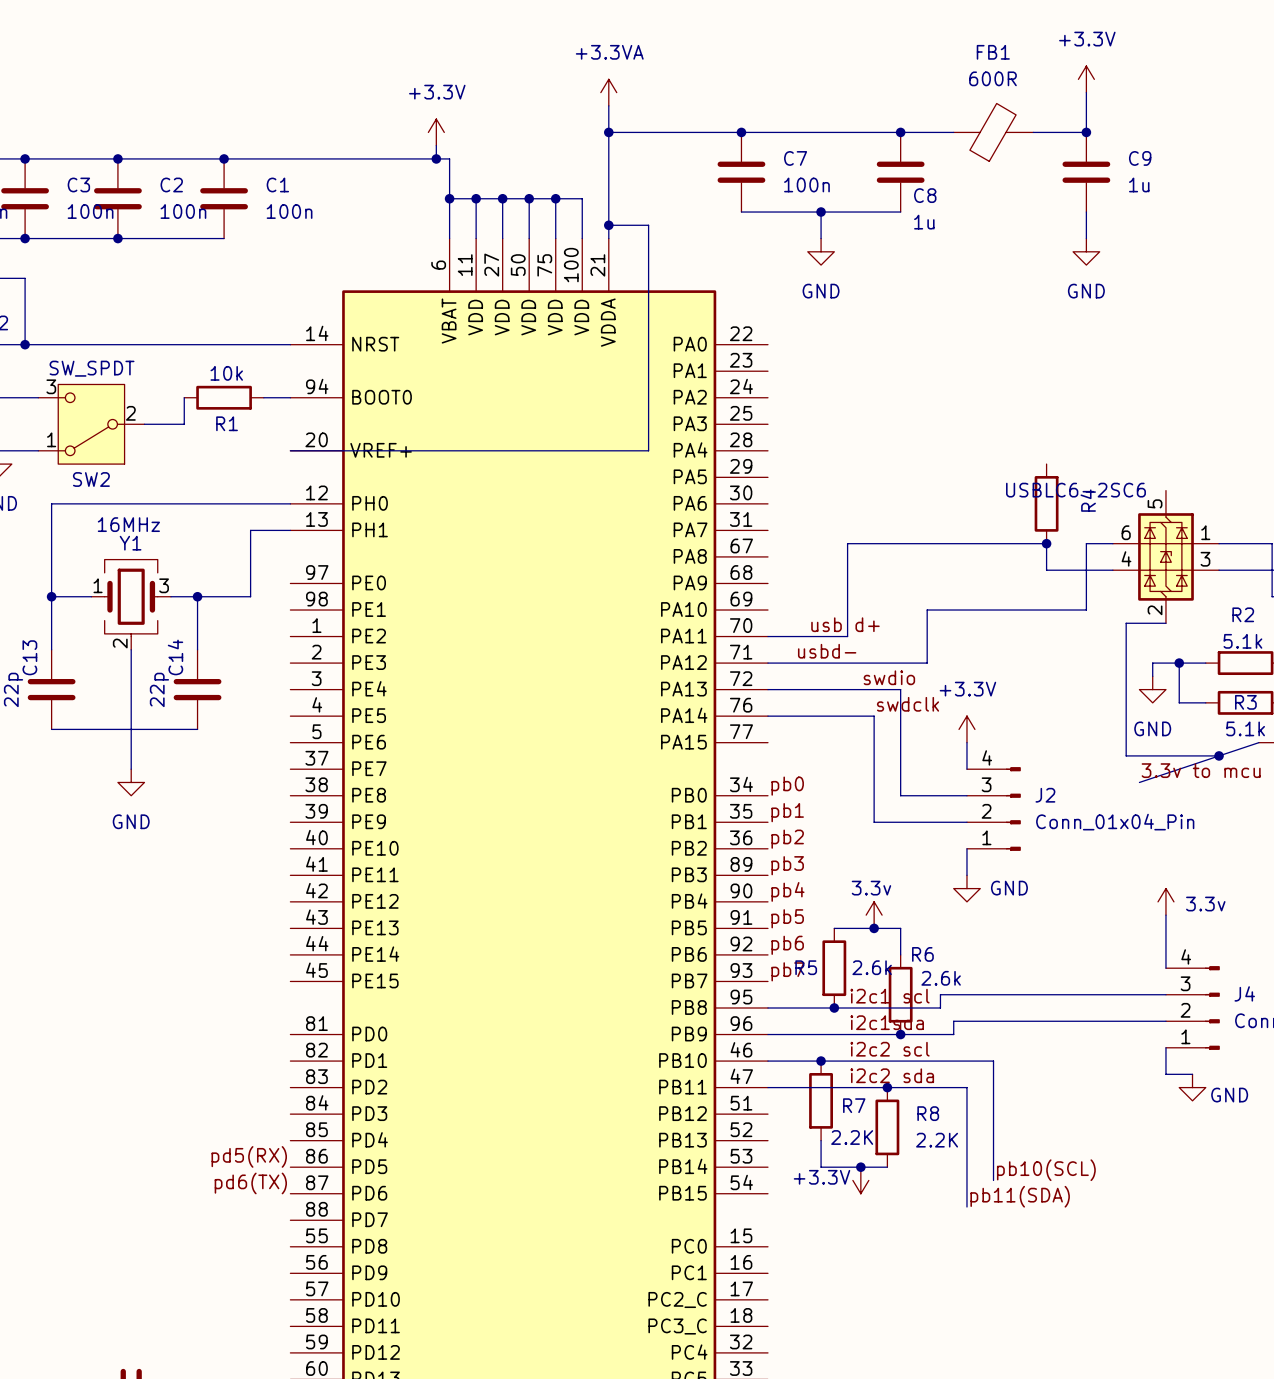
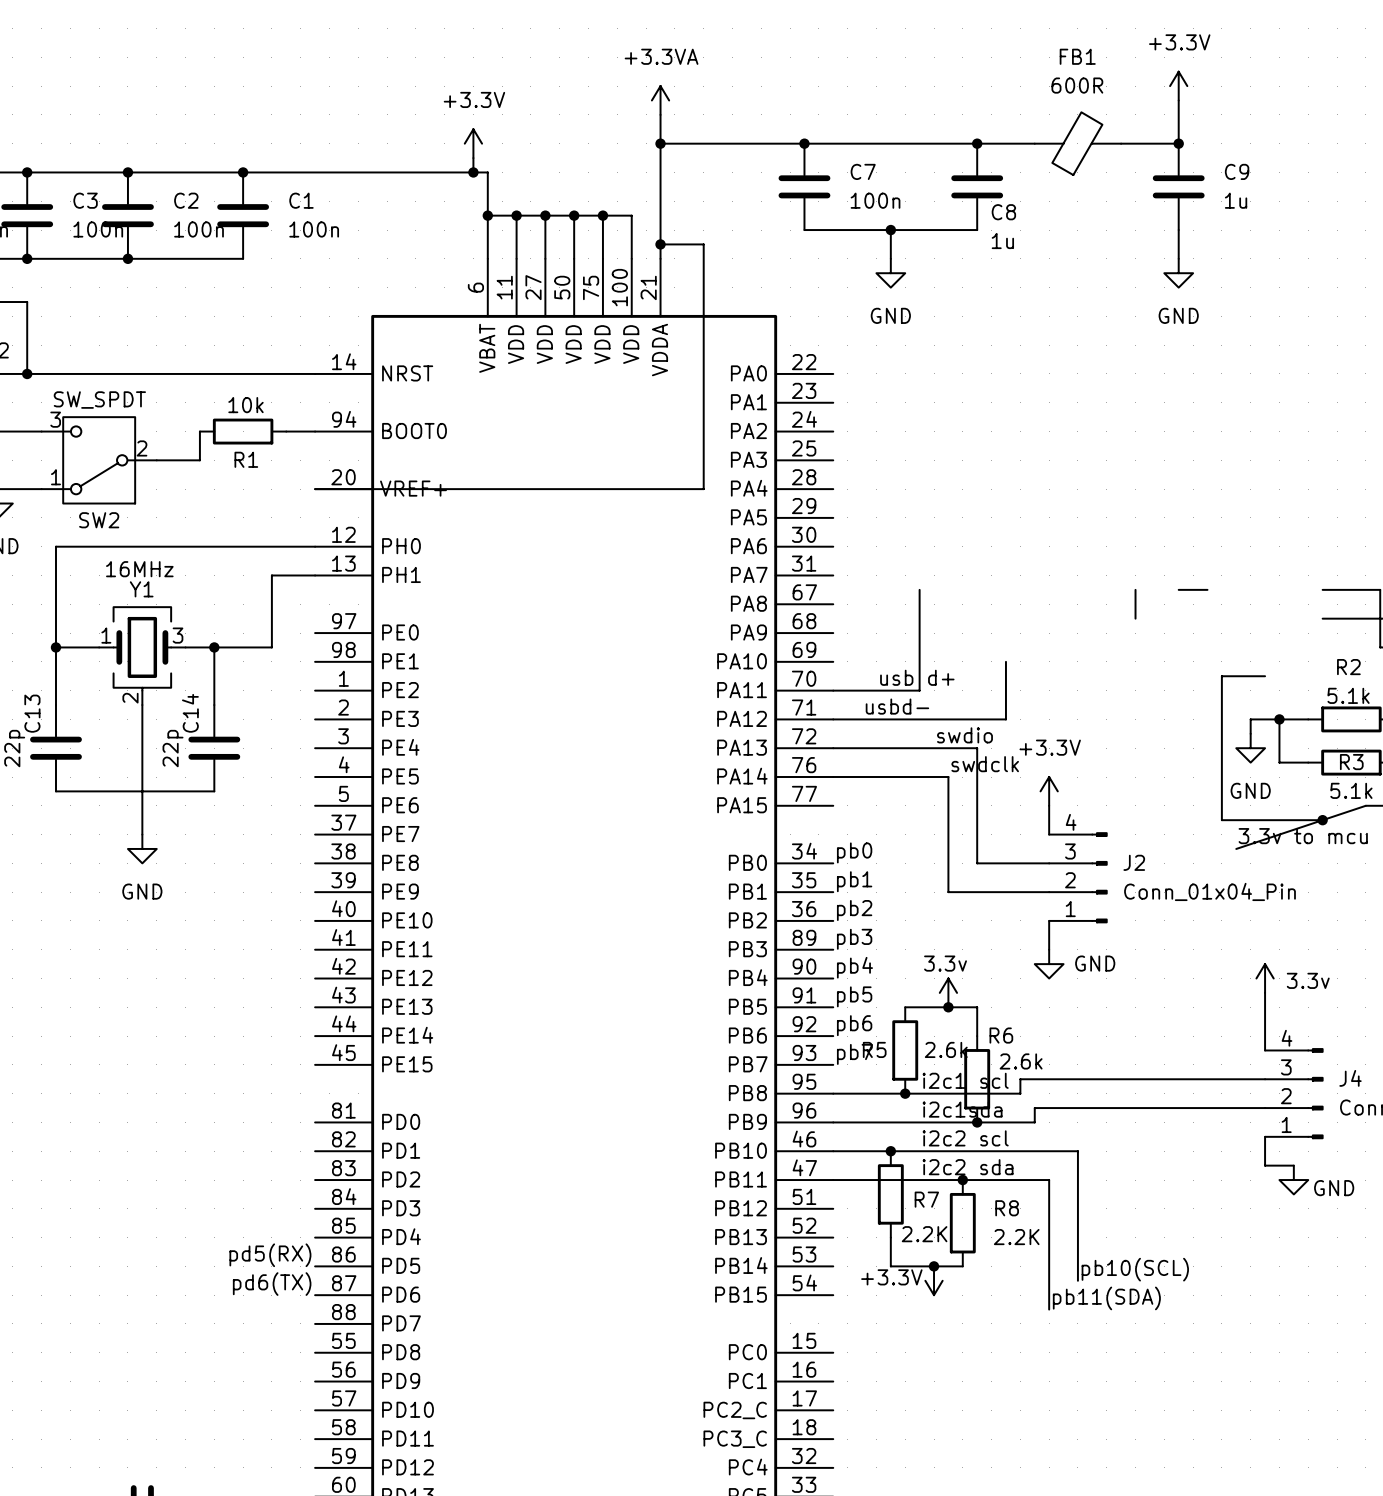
R4: (1046, 503) -> none
wire: (847, 543) (1046, 543) -> none
junction: (1046, 543) -> none
wire: (1086, 543) (1086, 610) (927, 610) -> none
part: USBLC6-2SC6 (1165, 556) -> none
wire: (1046, 570) (1112, 570) -> none

